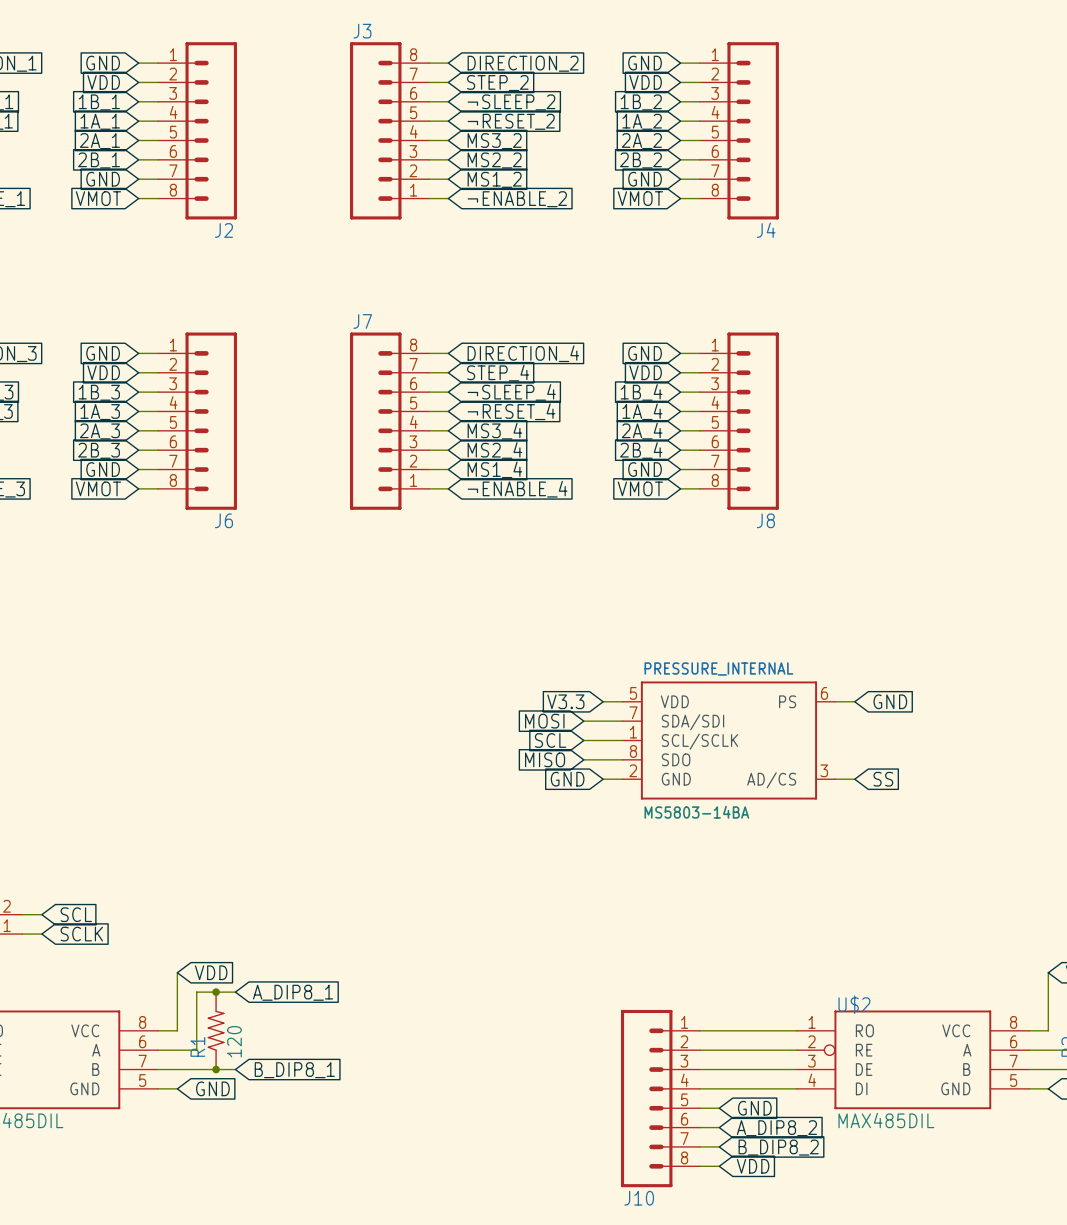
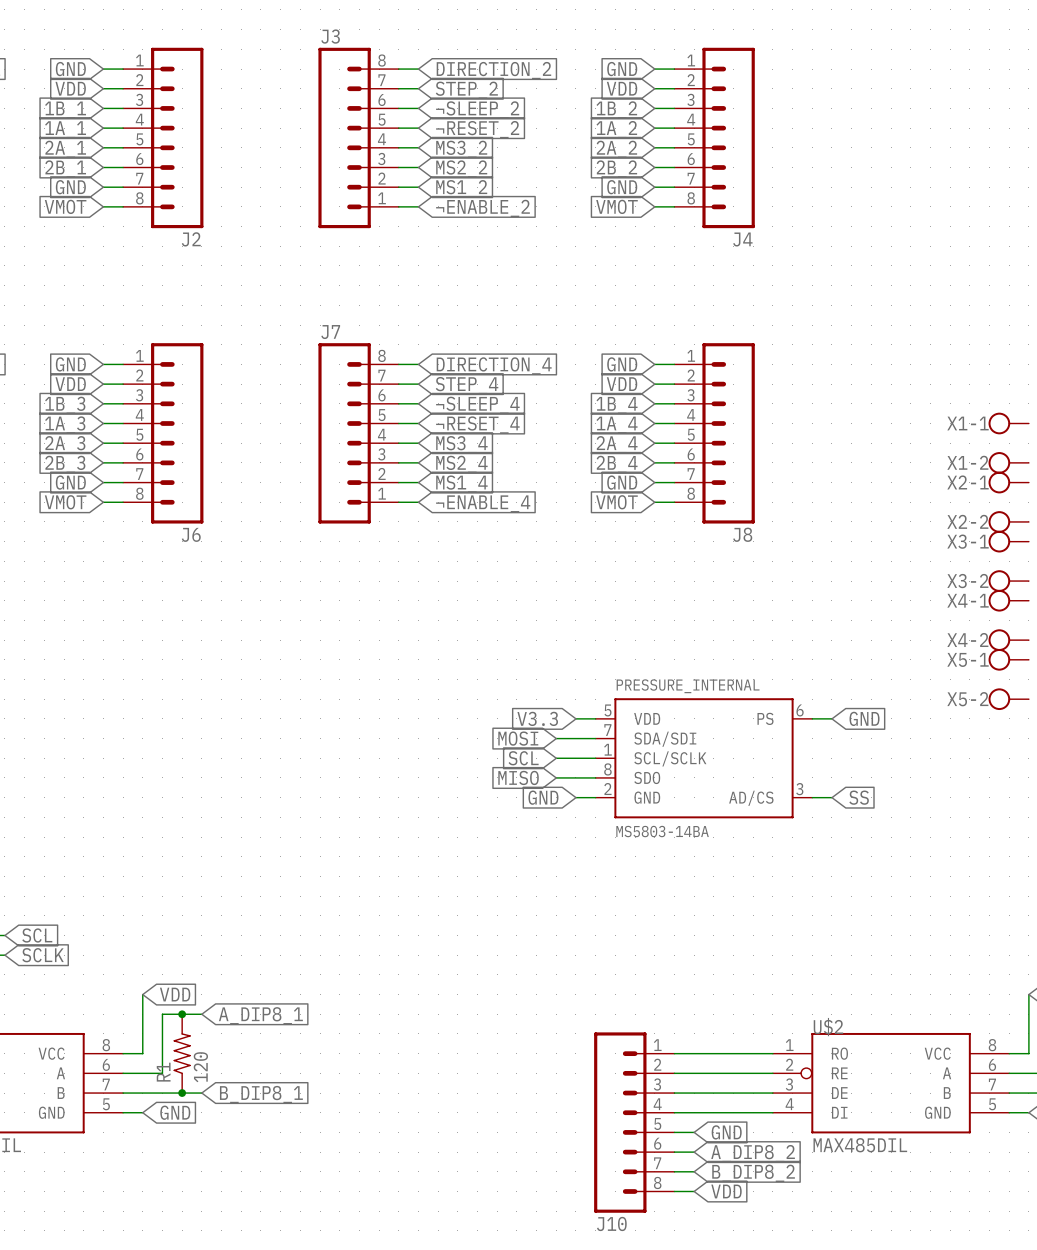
X1-1: none -> (1008, 423)
X1-2: none -> (1008, 462)
X2-1: none -> (1008, 482)
X2-2: none -> (1008, 521)
X3-1: none -> (1008, 541)
X3-2: none -> (1008, 581)
X4-1: none -> (1008, 600)
X4-2: none -> (1008, 640)
X5-1: none -> (1008, 659)
X5-2: none -> (1008, 699)

